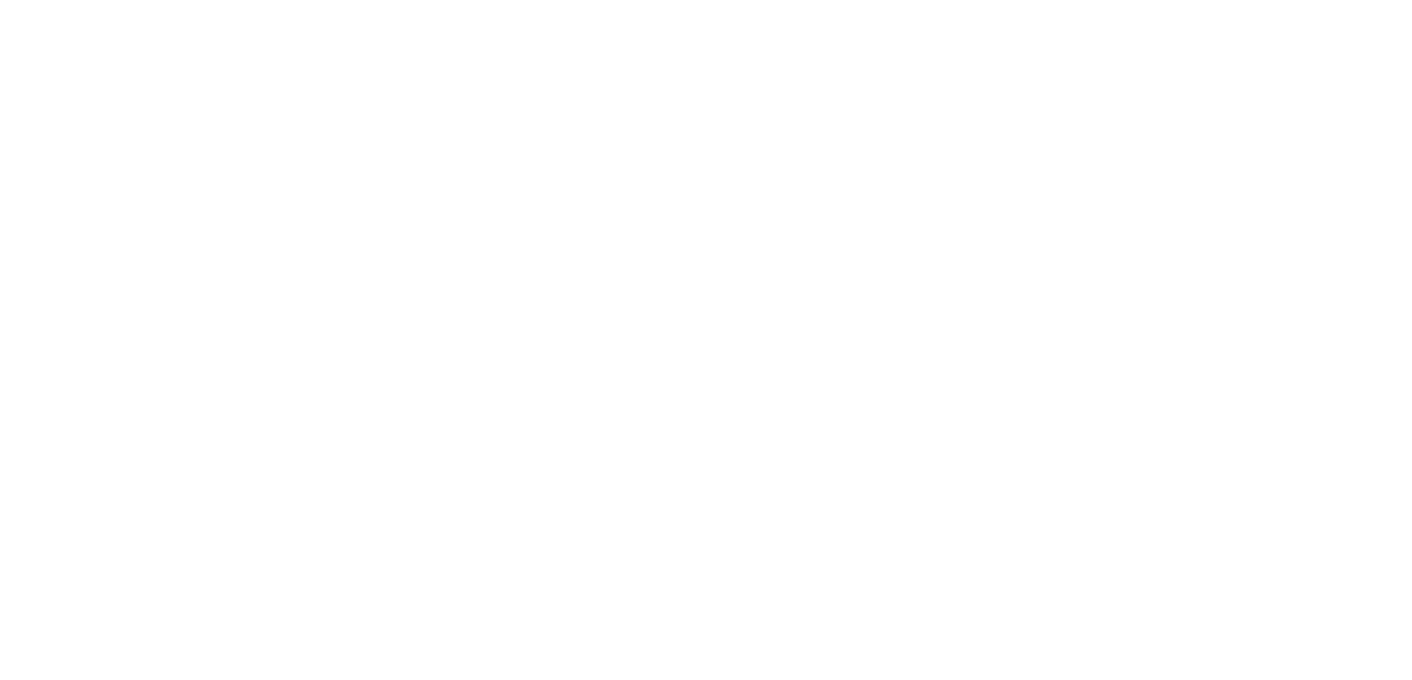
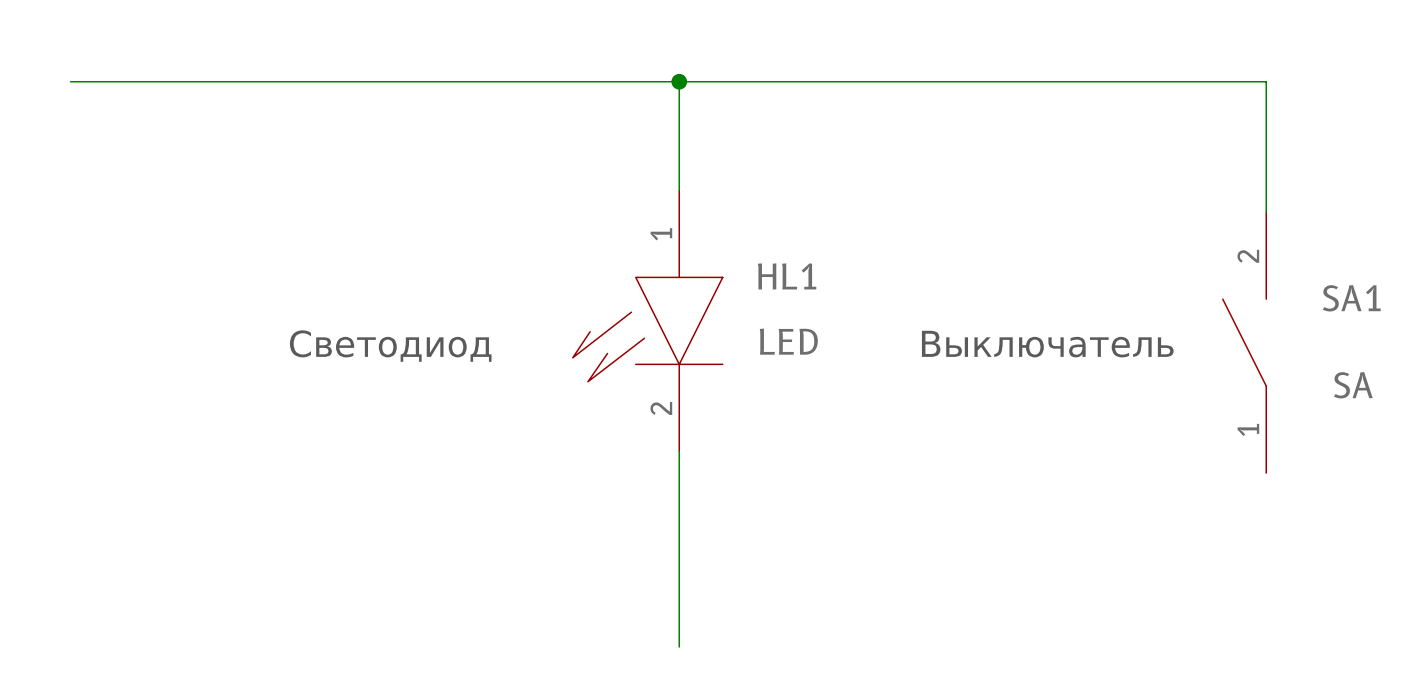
wire: none -> (70, 81) (1266, 81) (1266, 212)
wire: none -> (679, 81) (679, 190)
junction: none -> (679, 81)
HL1: none -> LED (647, 320)
SA1: none -> SA (1244, 342)
text: none -> Выключатель (1047, 344)
text: none -> Светодиод (390, 346)
wire: none -> (679, 451) (679, 646)

